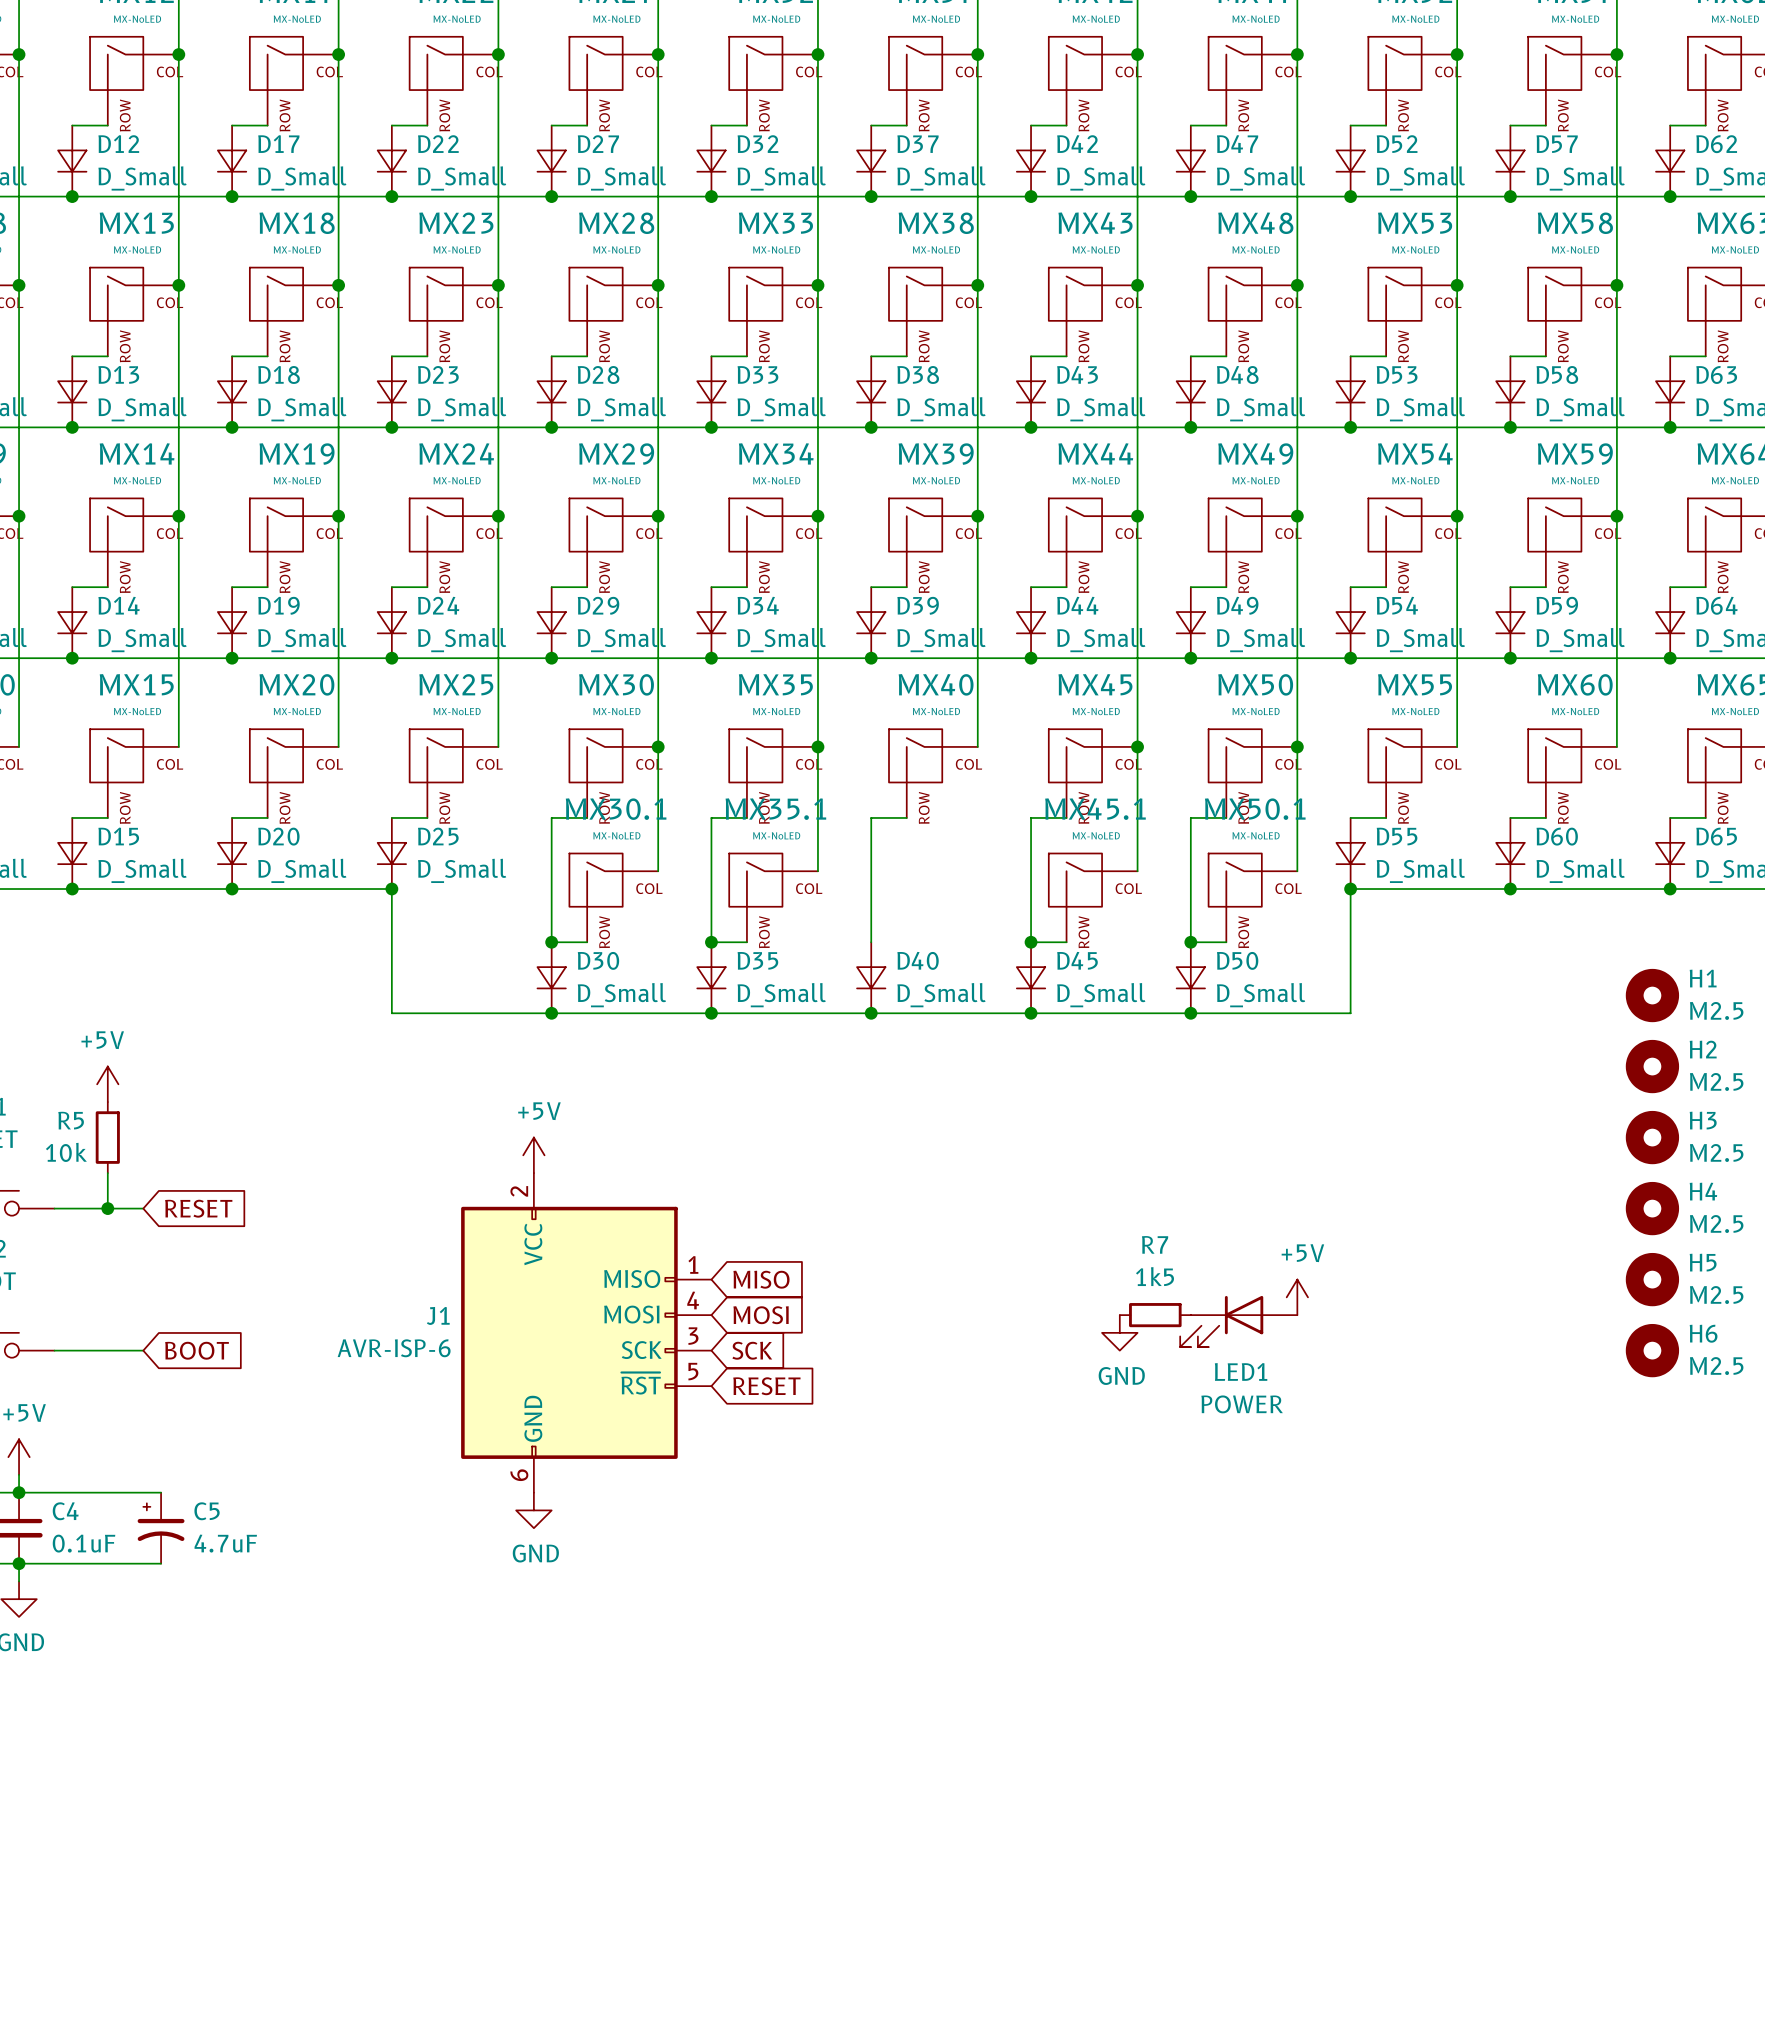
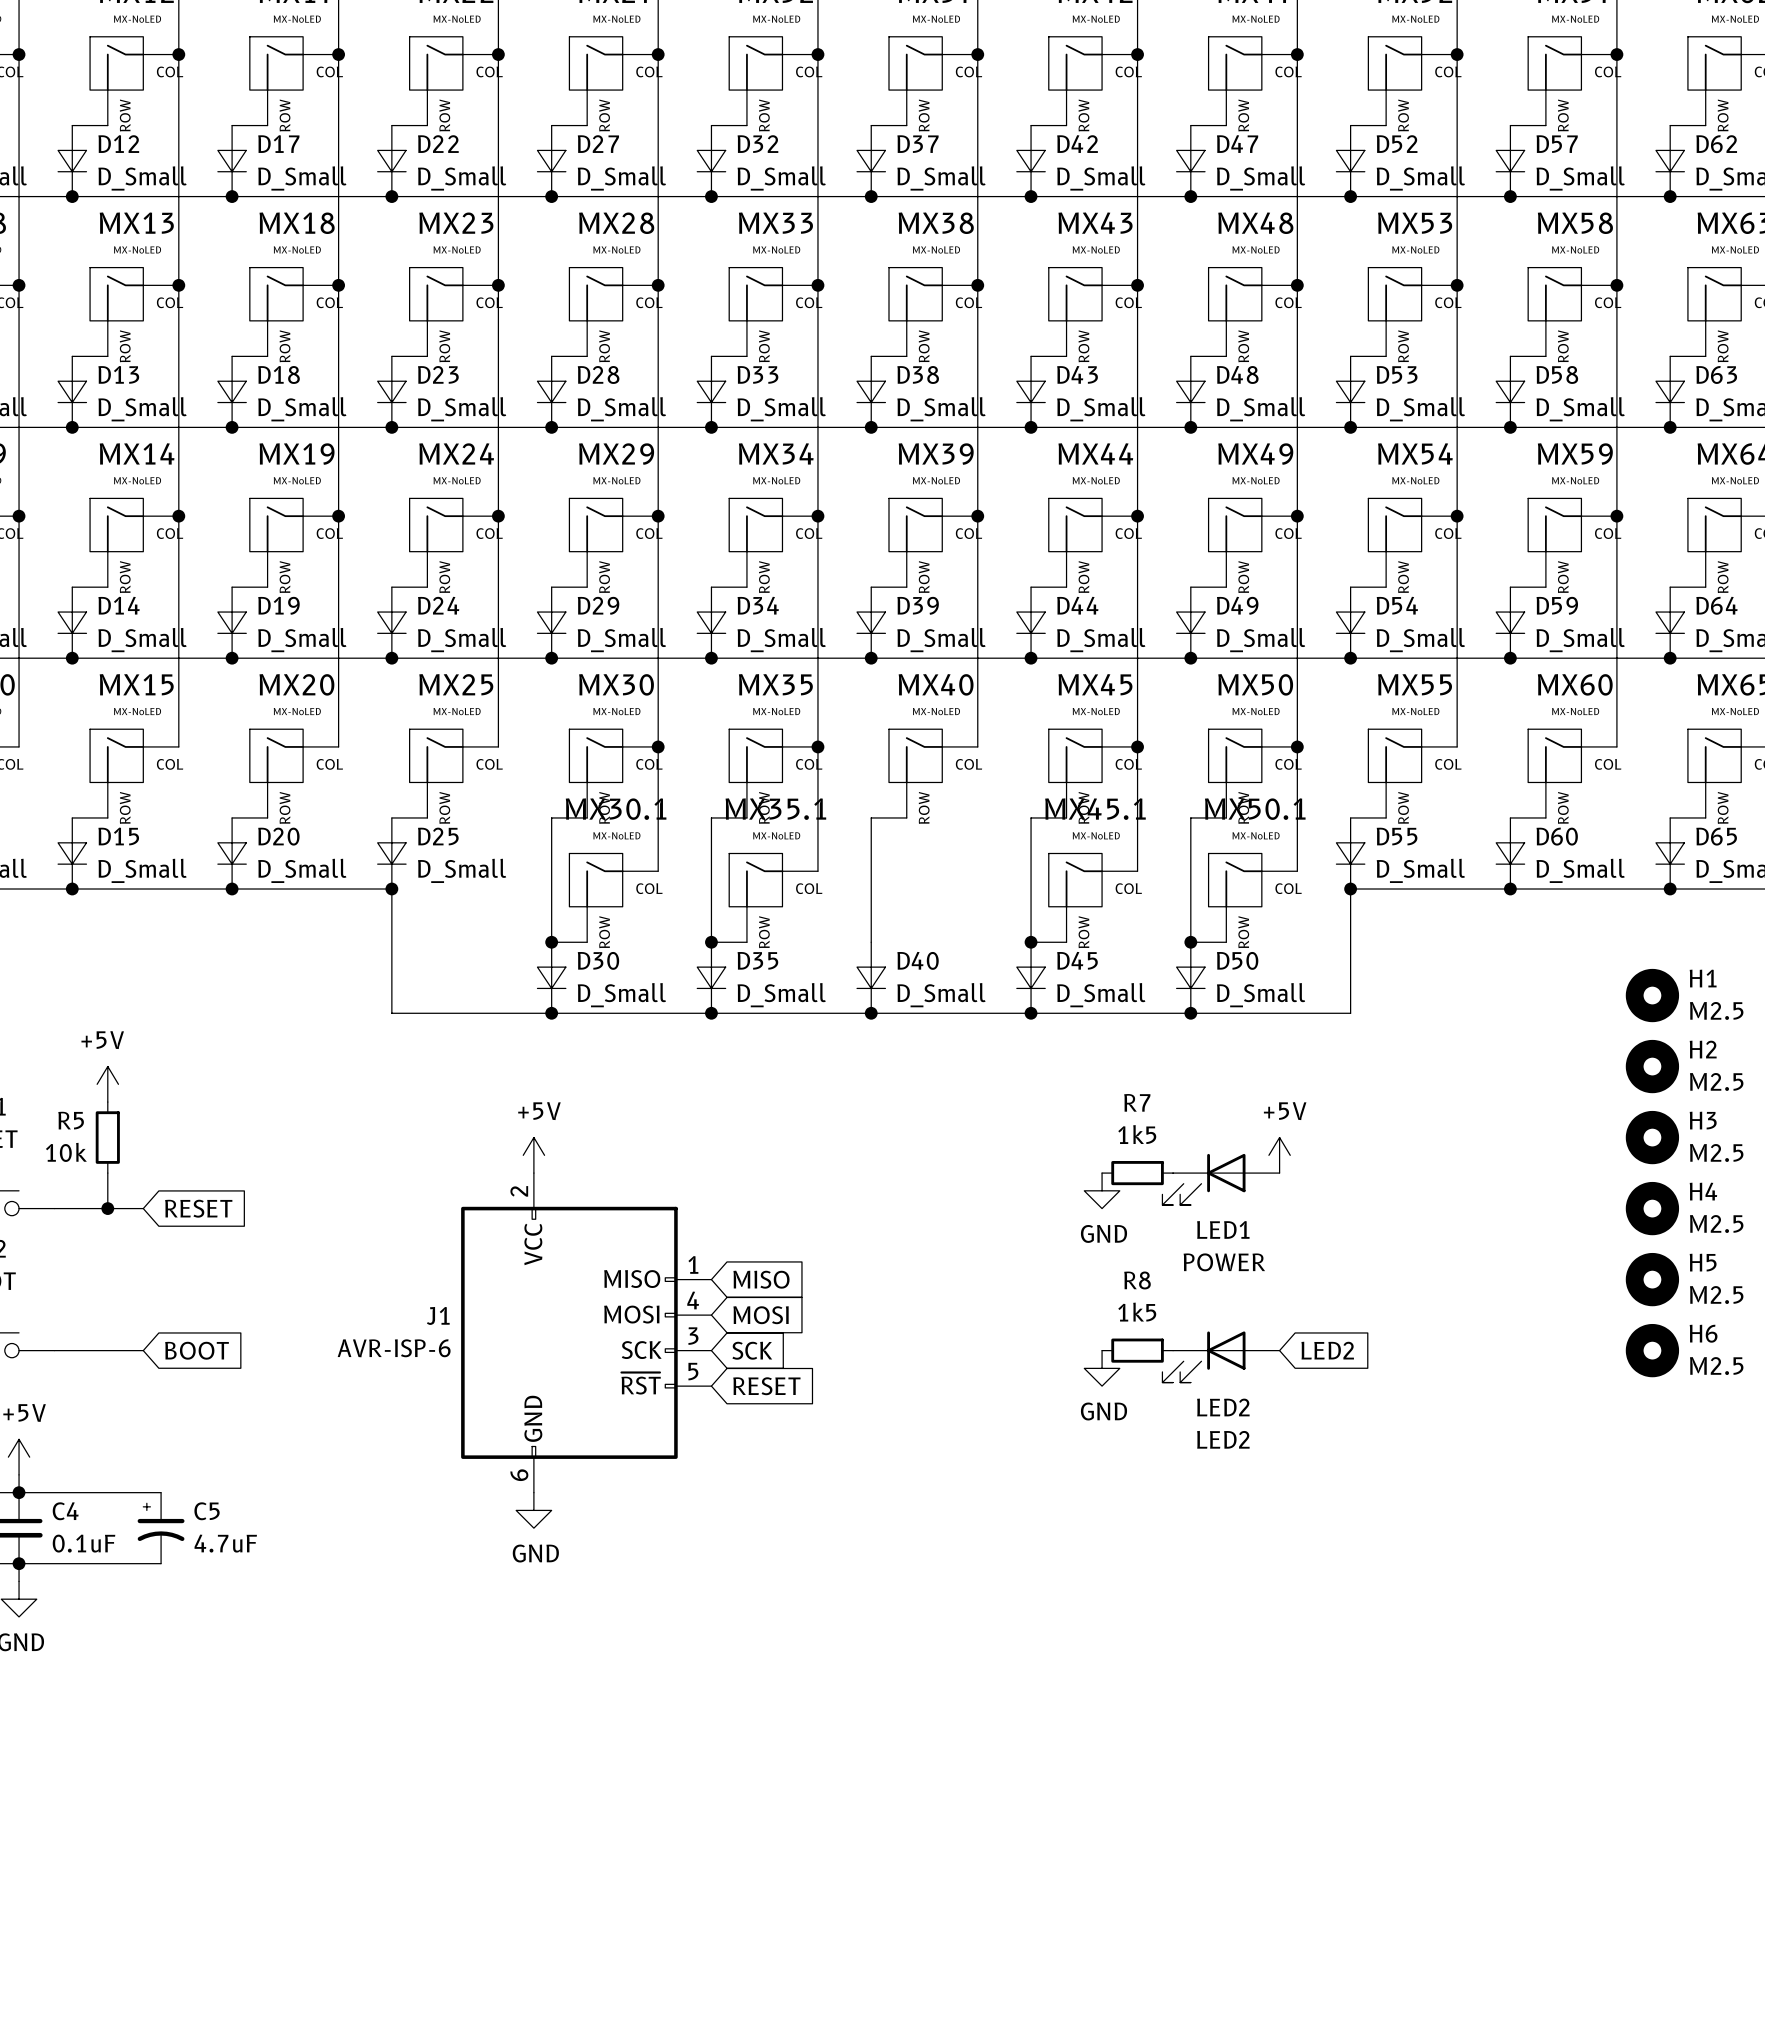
power symbol: none -> GND (1102, 1190)
power symbol position: +5V (1297, 1297) -> +5V (1279, 1155)
R7 position: (1155, 1315) -> (1137, 1173)
LED1 position: (1238, 1321) -> (1221, 1179)
power symbol position: GND (1119, 1332) -> GND (1102, 1368)
R8: none -> 1k5 (1137, 1350)
global label: none -> LED2 (1327, 1350)
LED2: none -> LED2 (1221, 1357)

